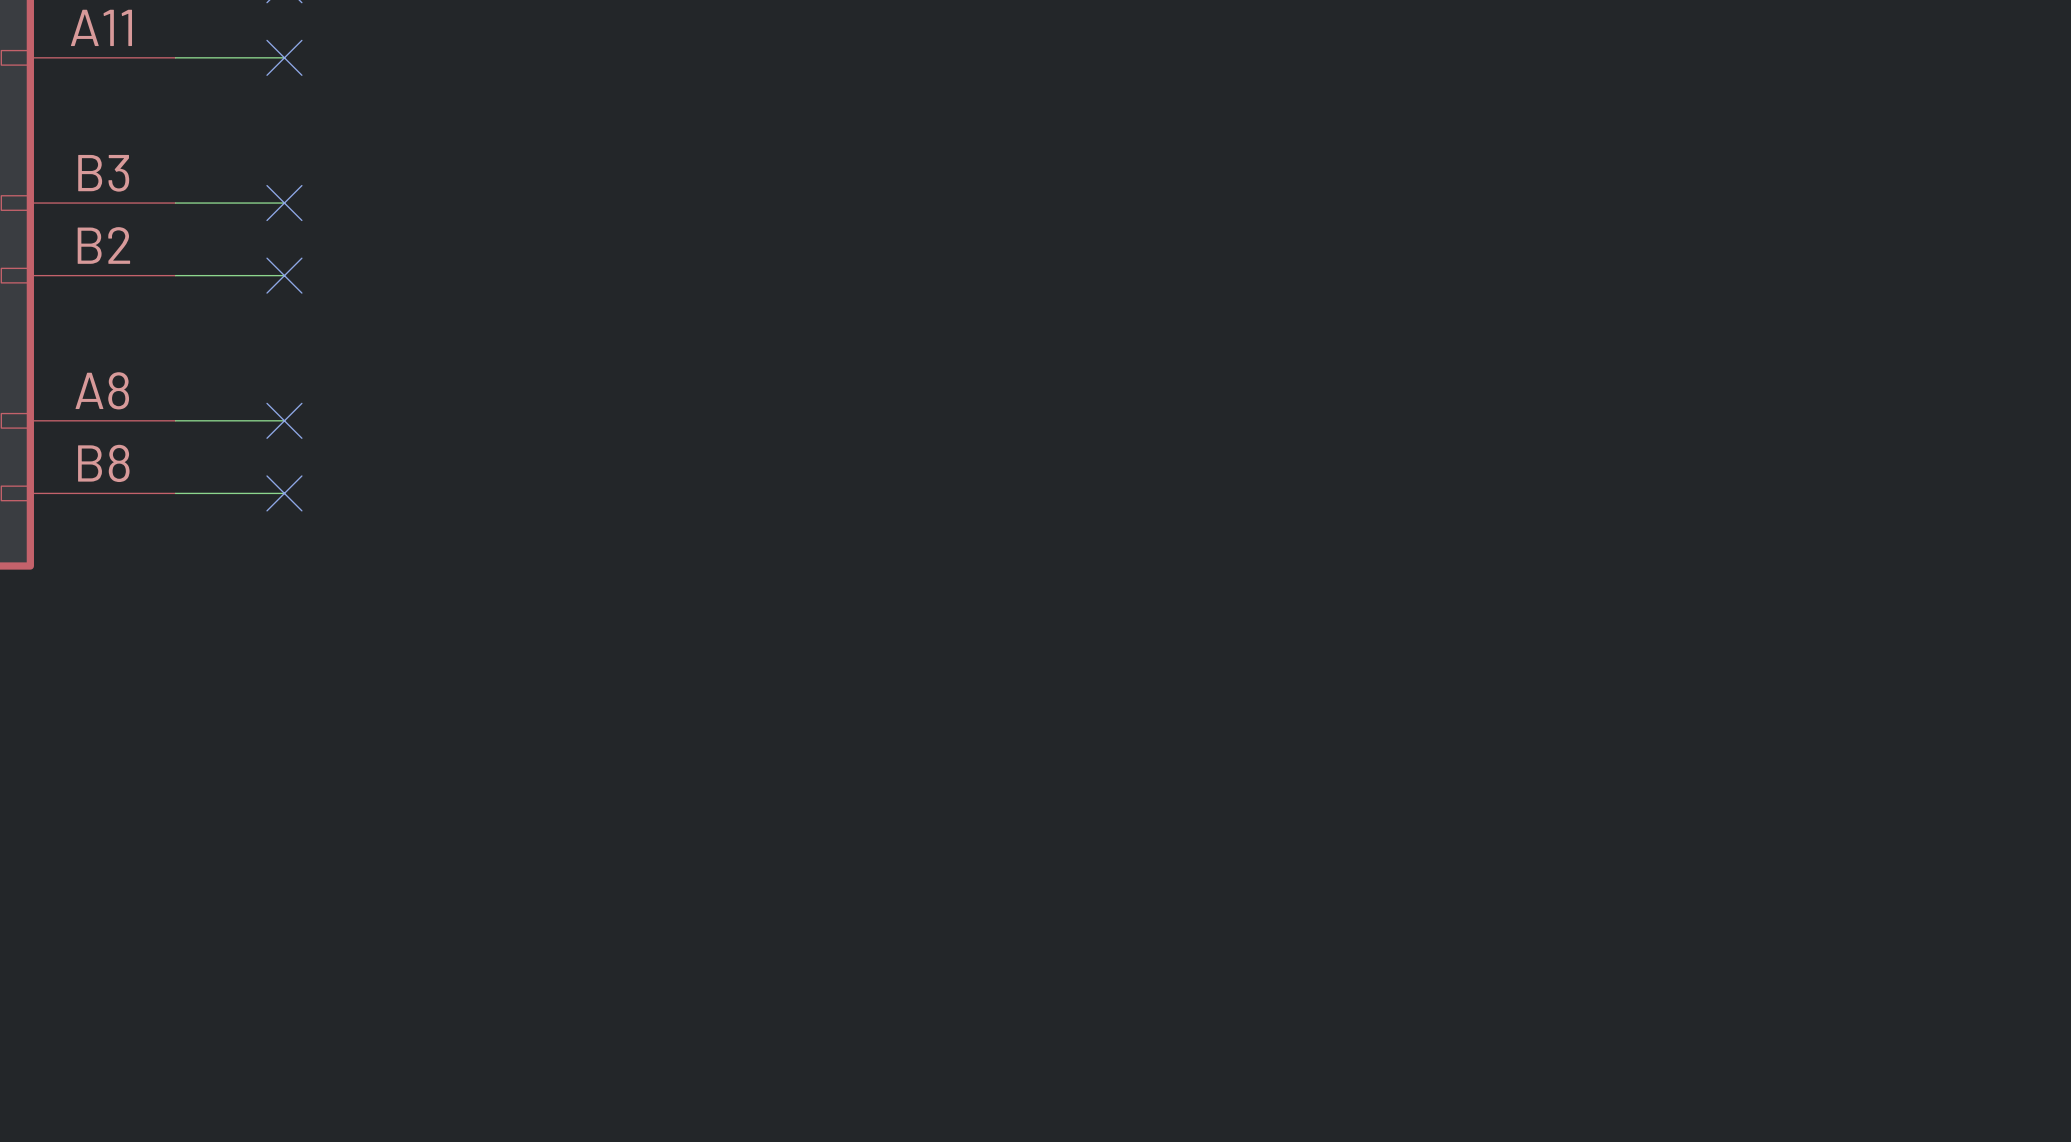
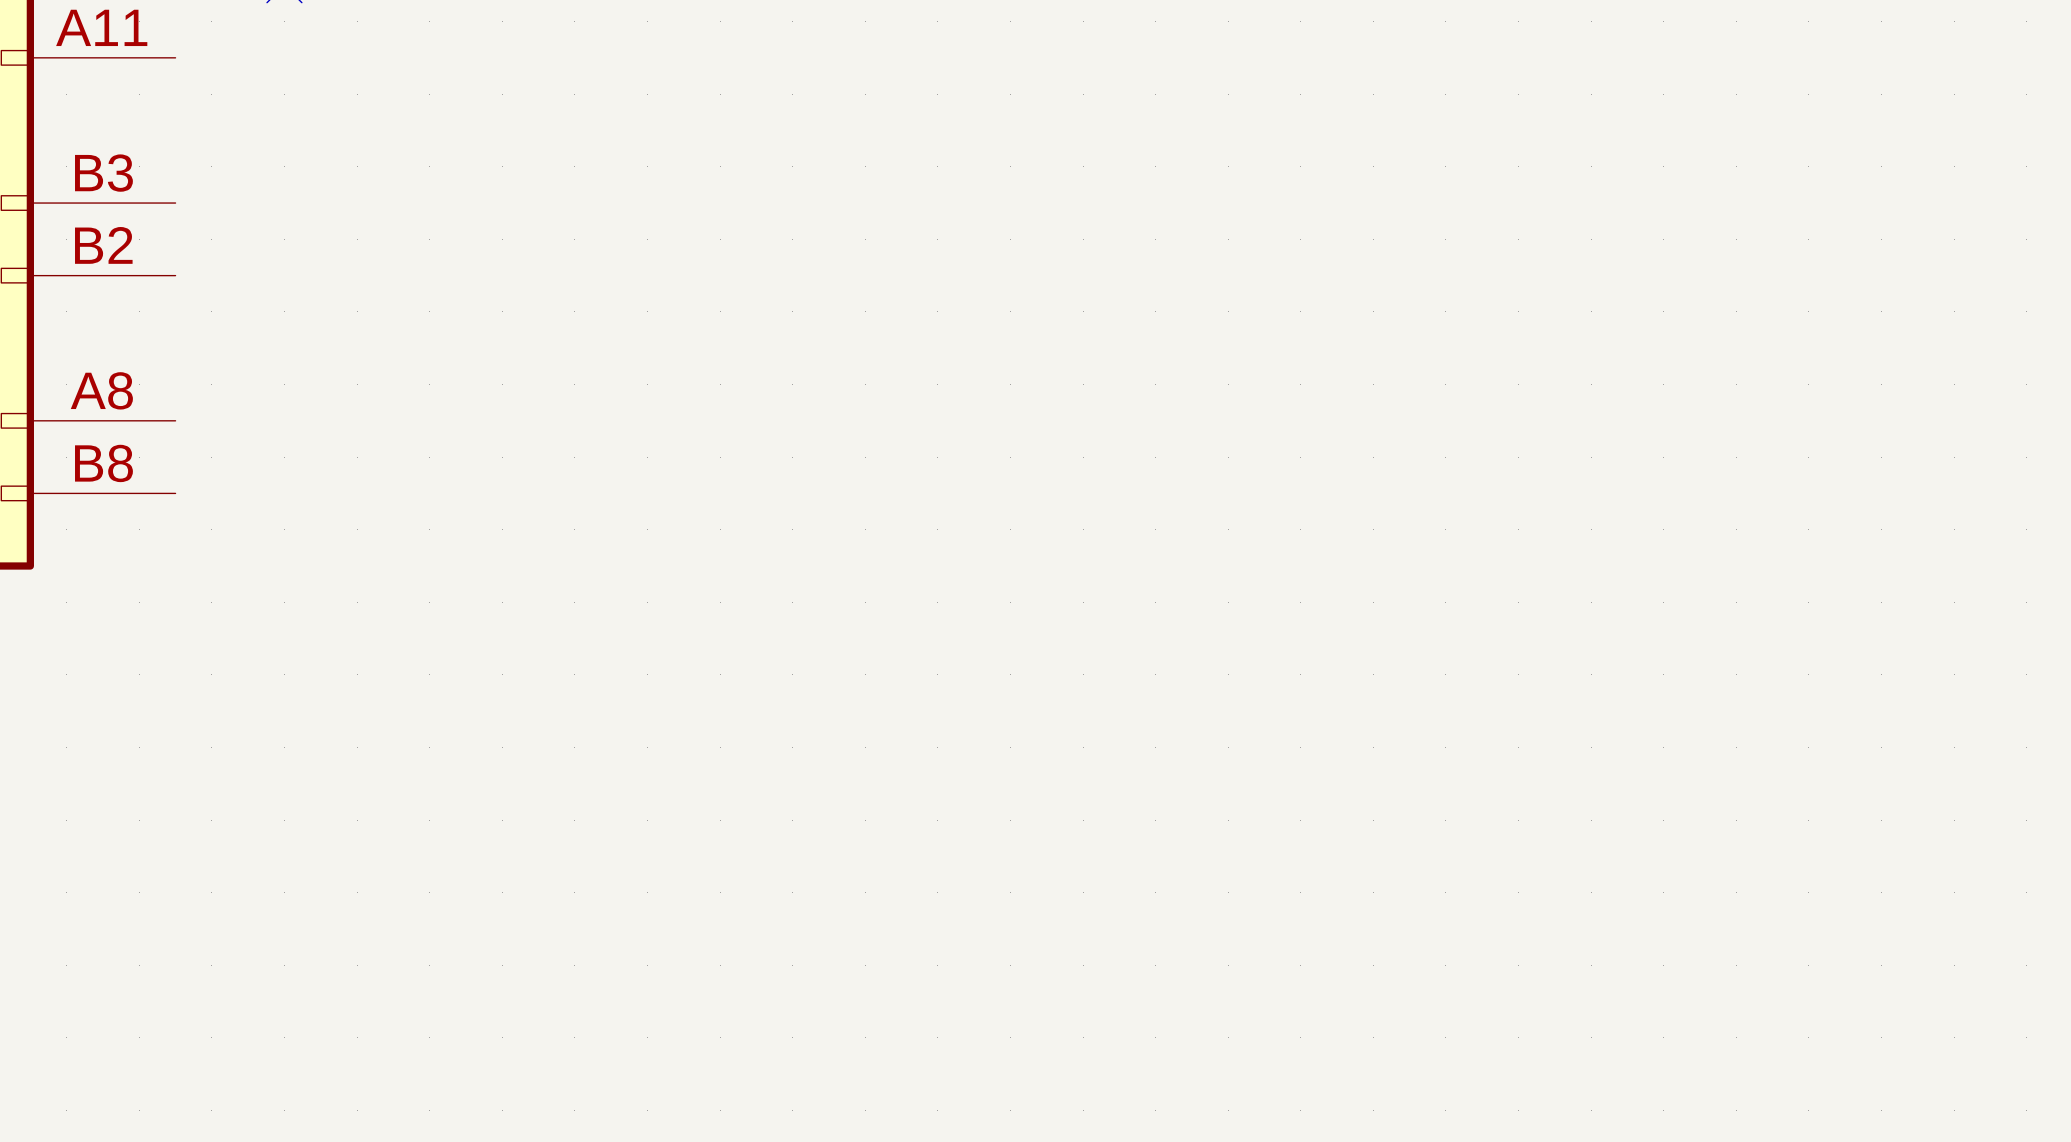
wire: (175, 57) (284, 57) -> none
no-connect mark: (284, 57) -> none
wire: (175, 203) (284, 203) -> none
no-connect mark: (284, 203) -> none
wire: (175, 275) (284, 275) -> none
no-connect mark: (284, 275) -> none
wire: (175, 420) (284, 420) -> none
no-connect mark: (284, 420) -> none
wire: (175, 493) (284, 493) -> none
no-connect mark: (284, 493) -> none

